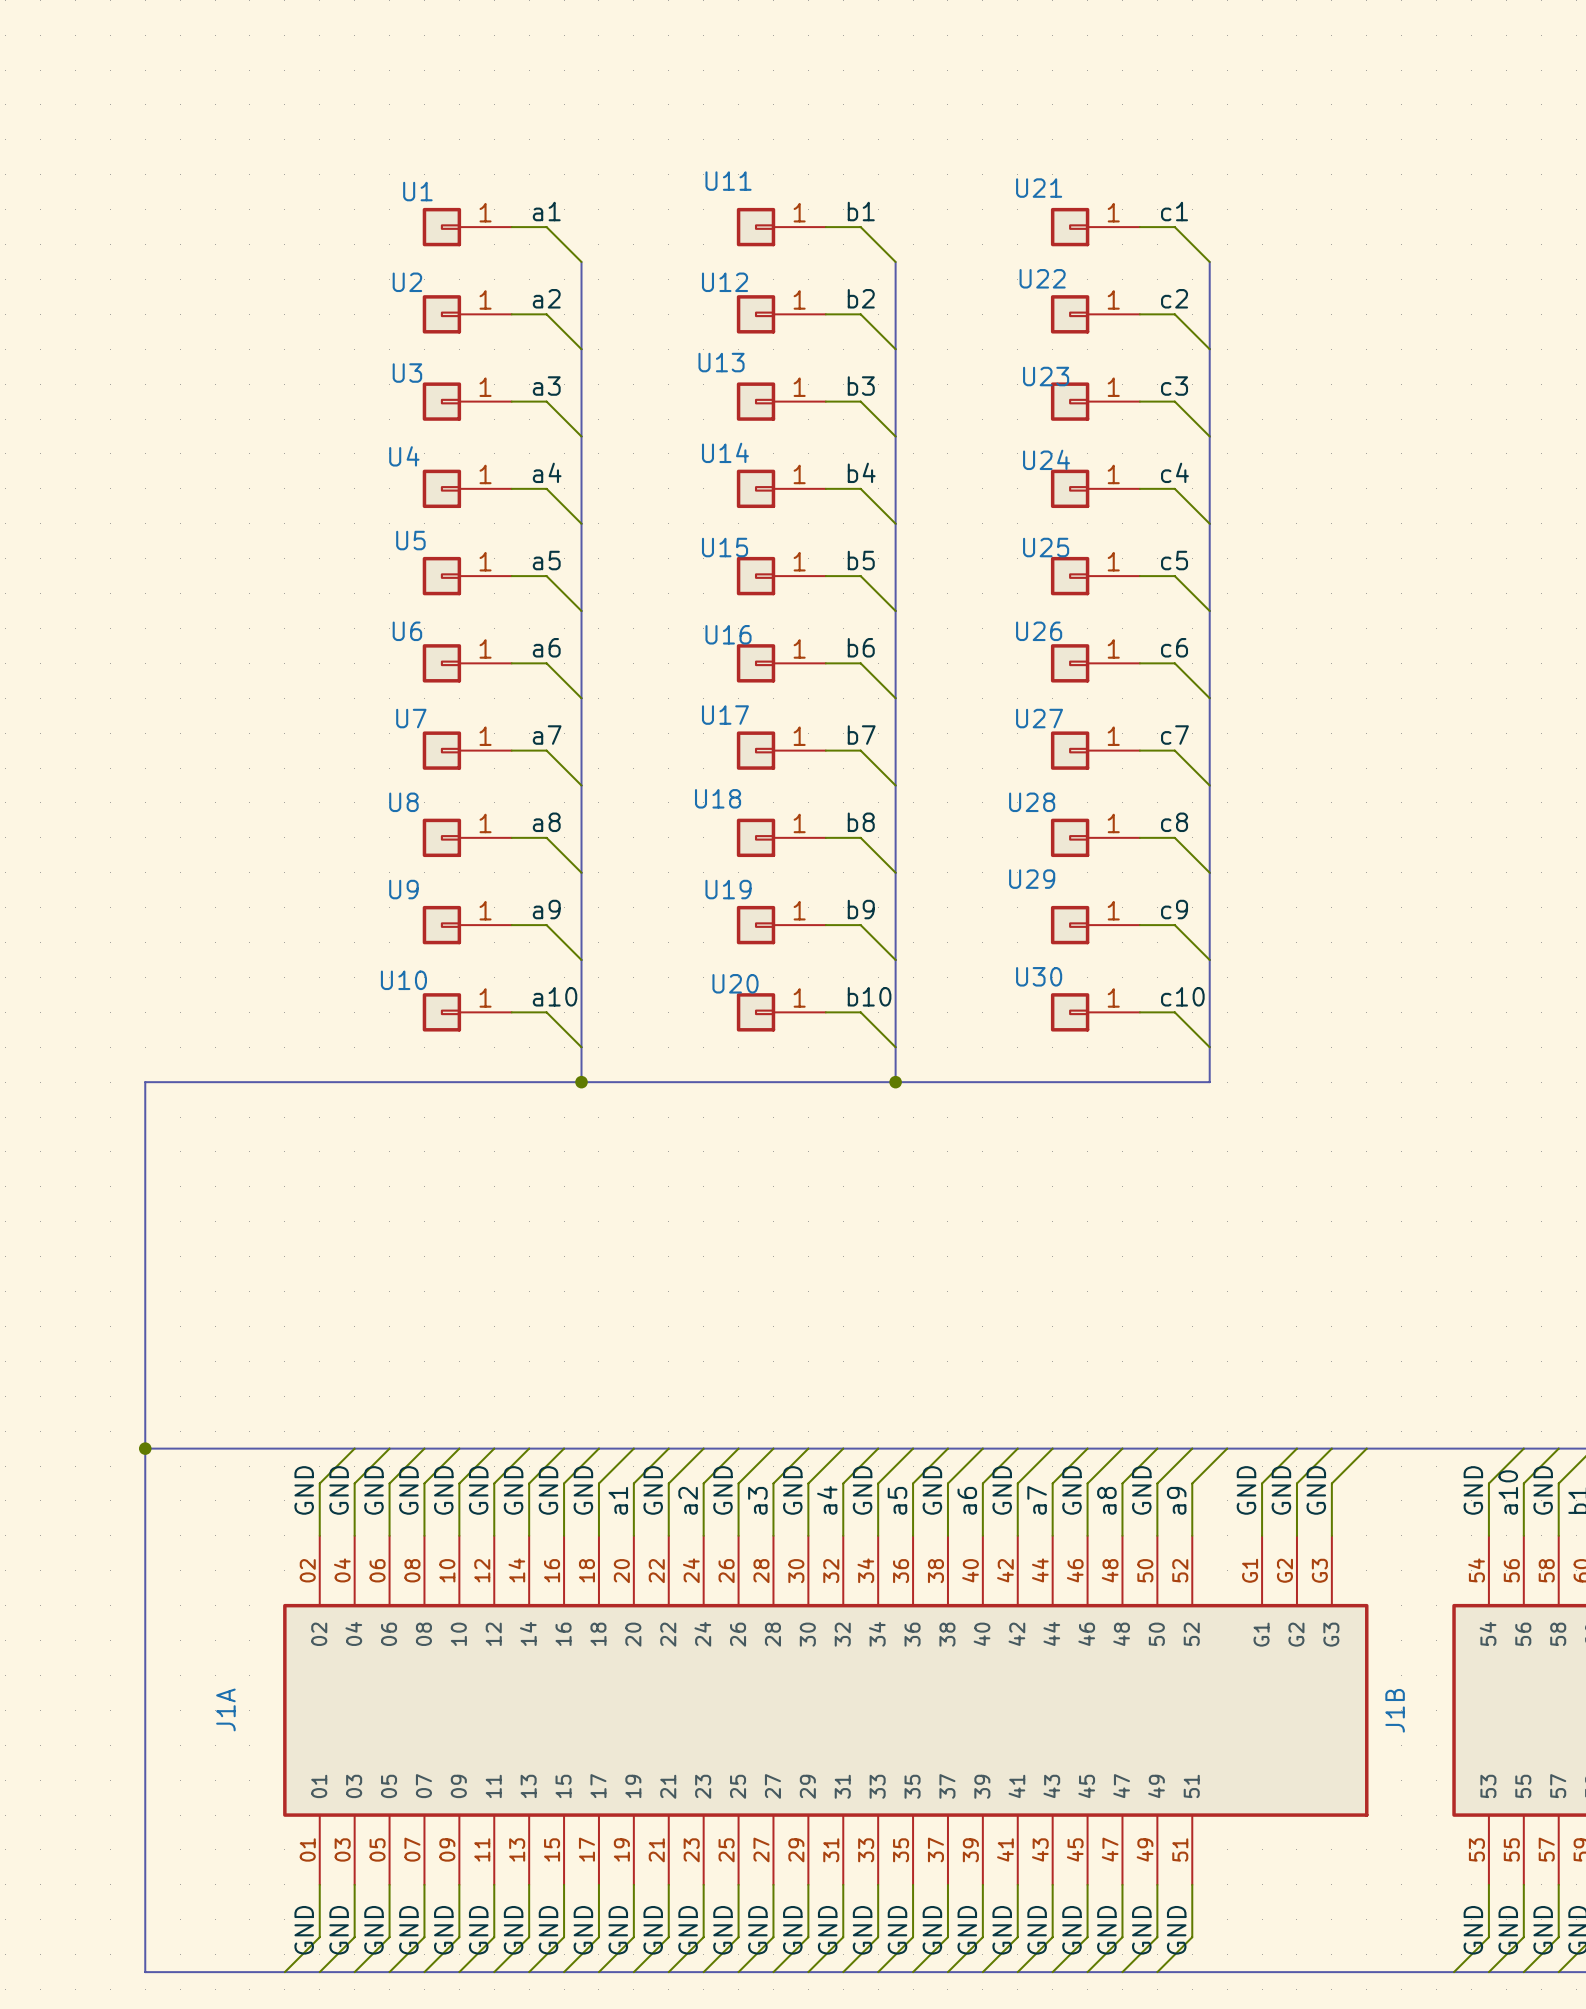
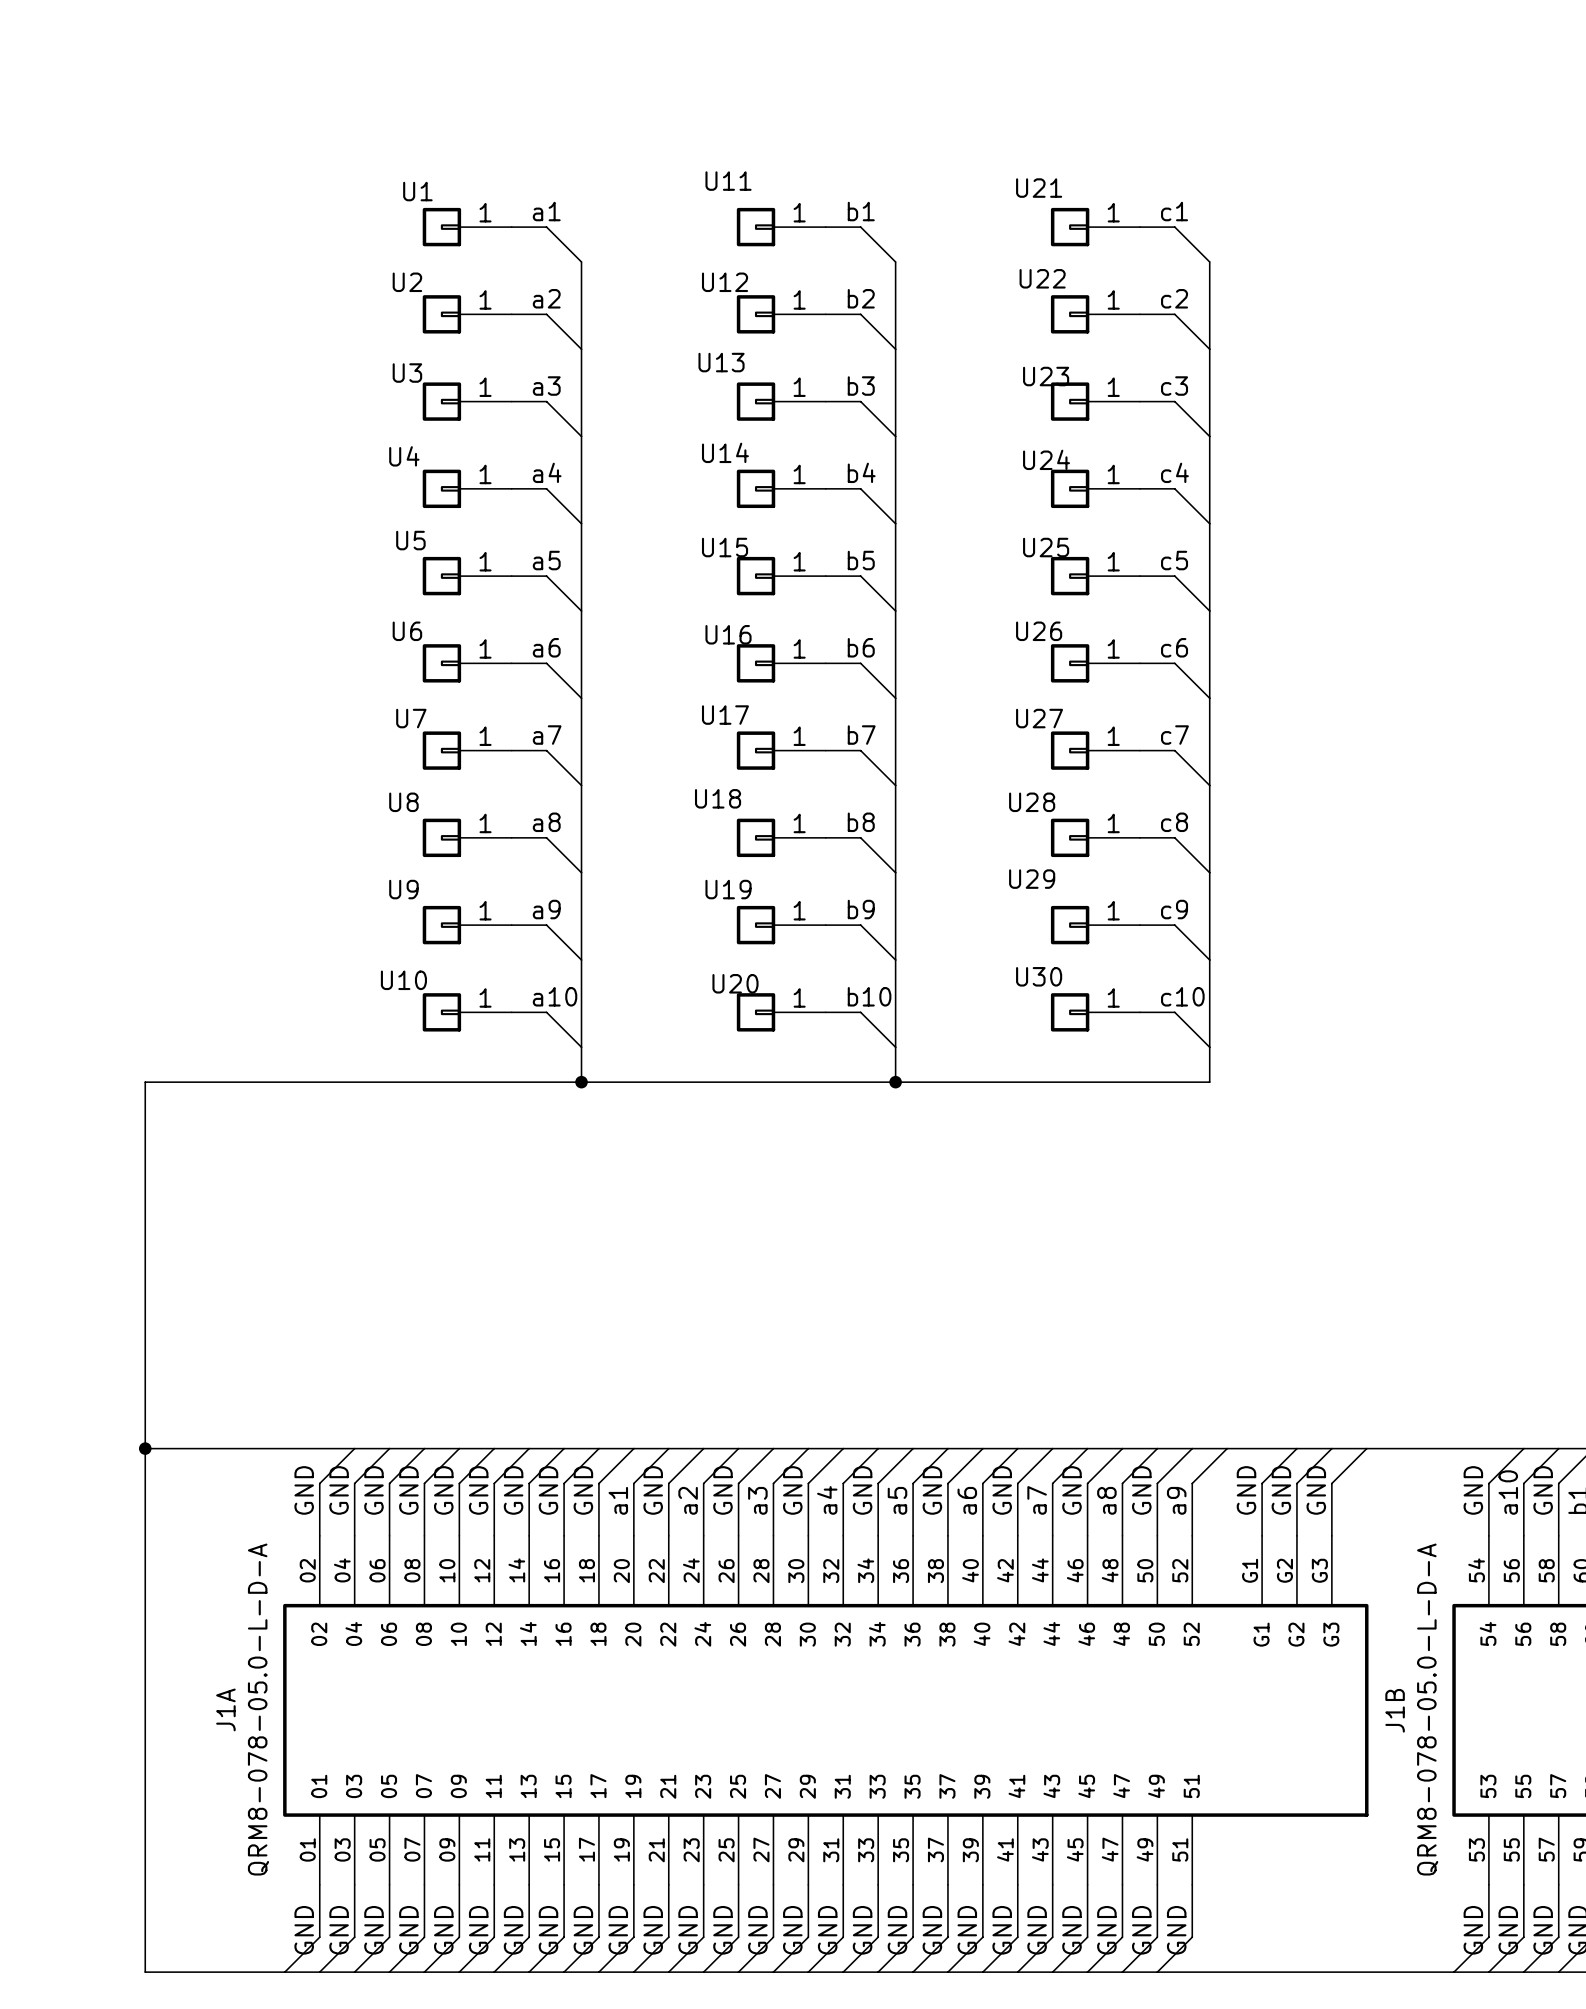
J1A value: none -> QRM8-078-05.0-L-D-A (258, 1709)
J1B value: none -> QRM8-078-05.0-L-D-A (1427, 1709)

